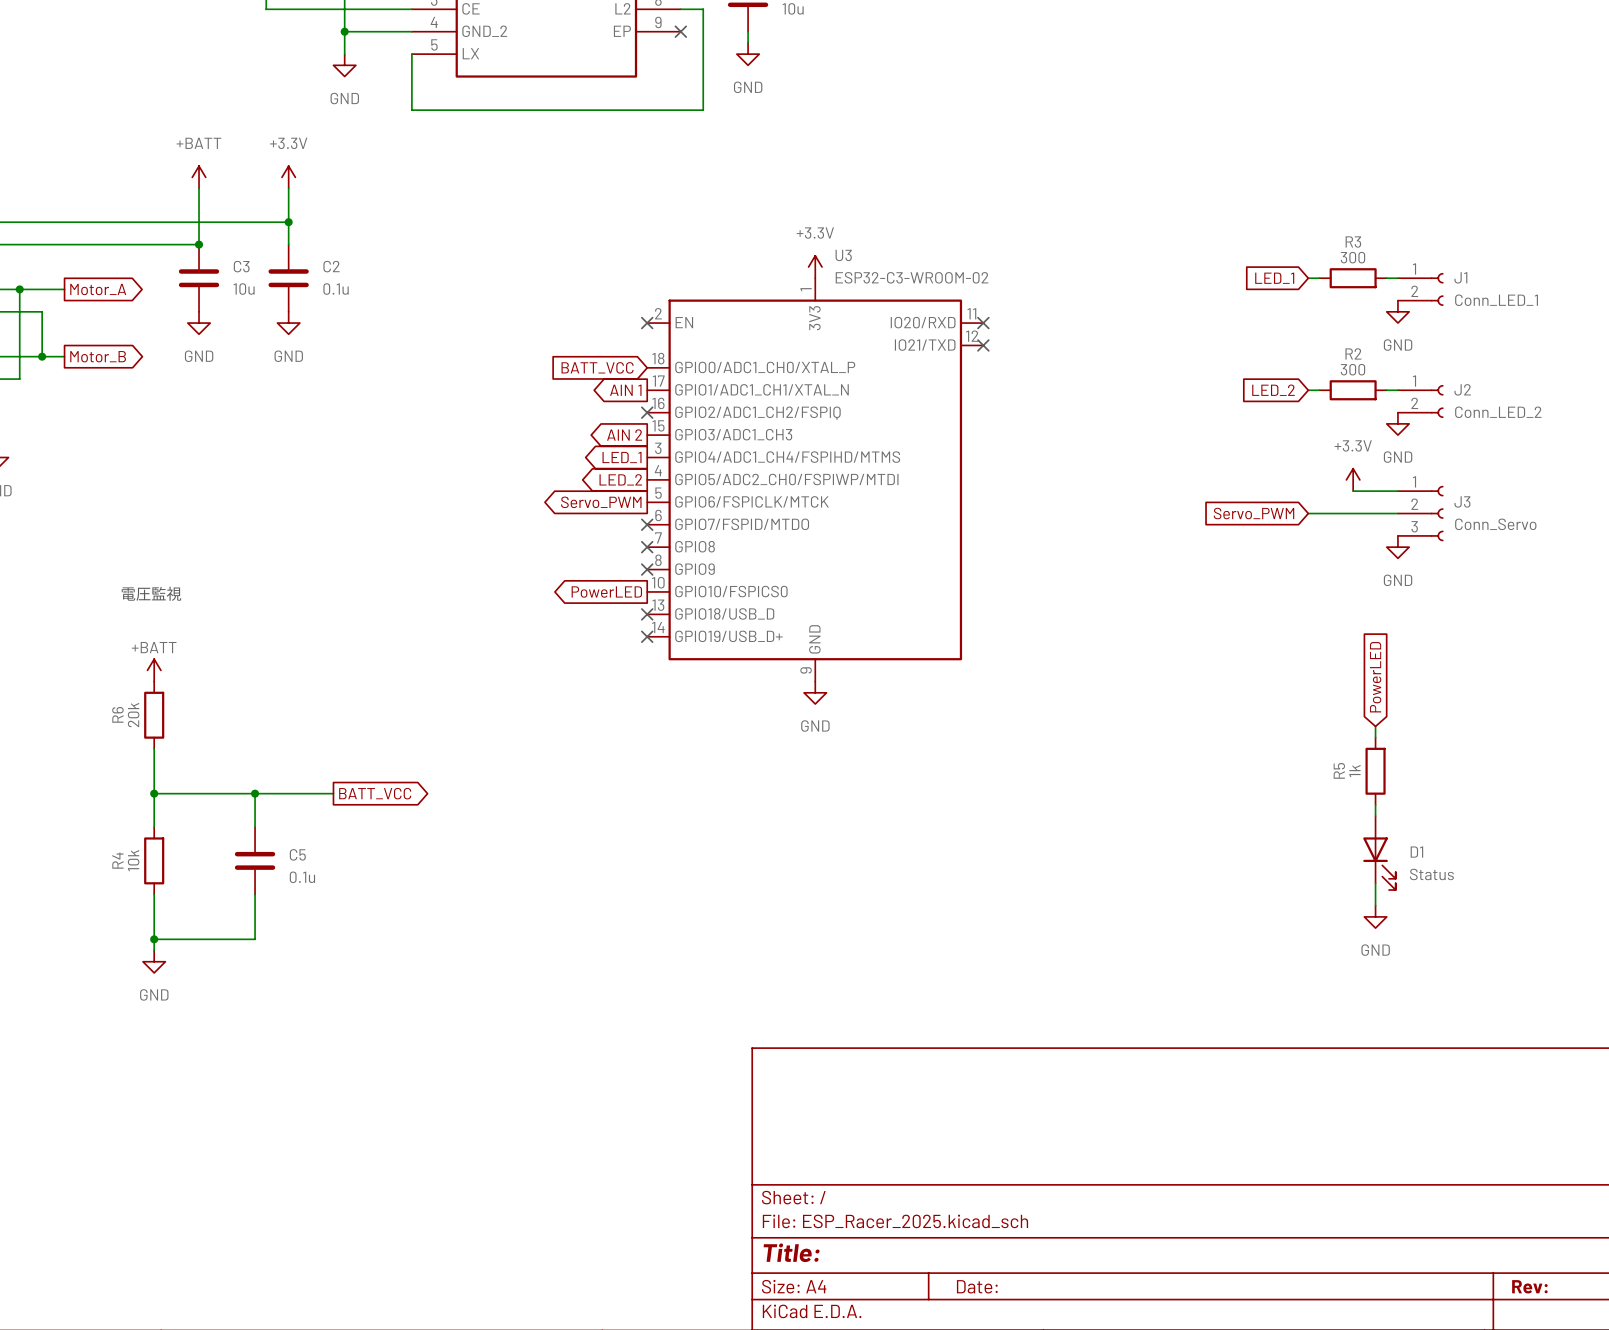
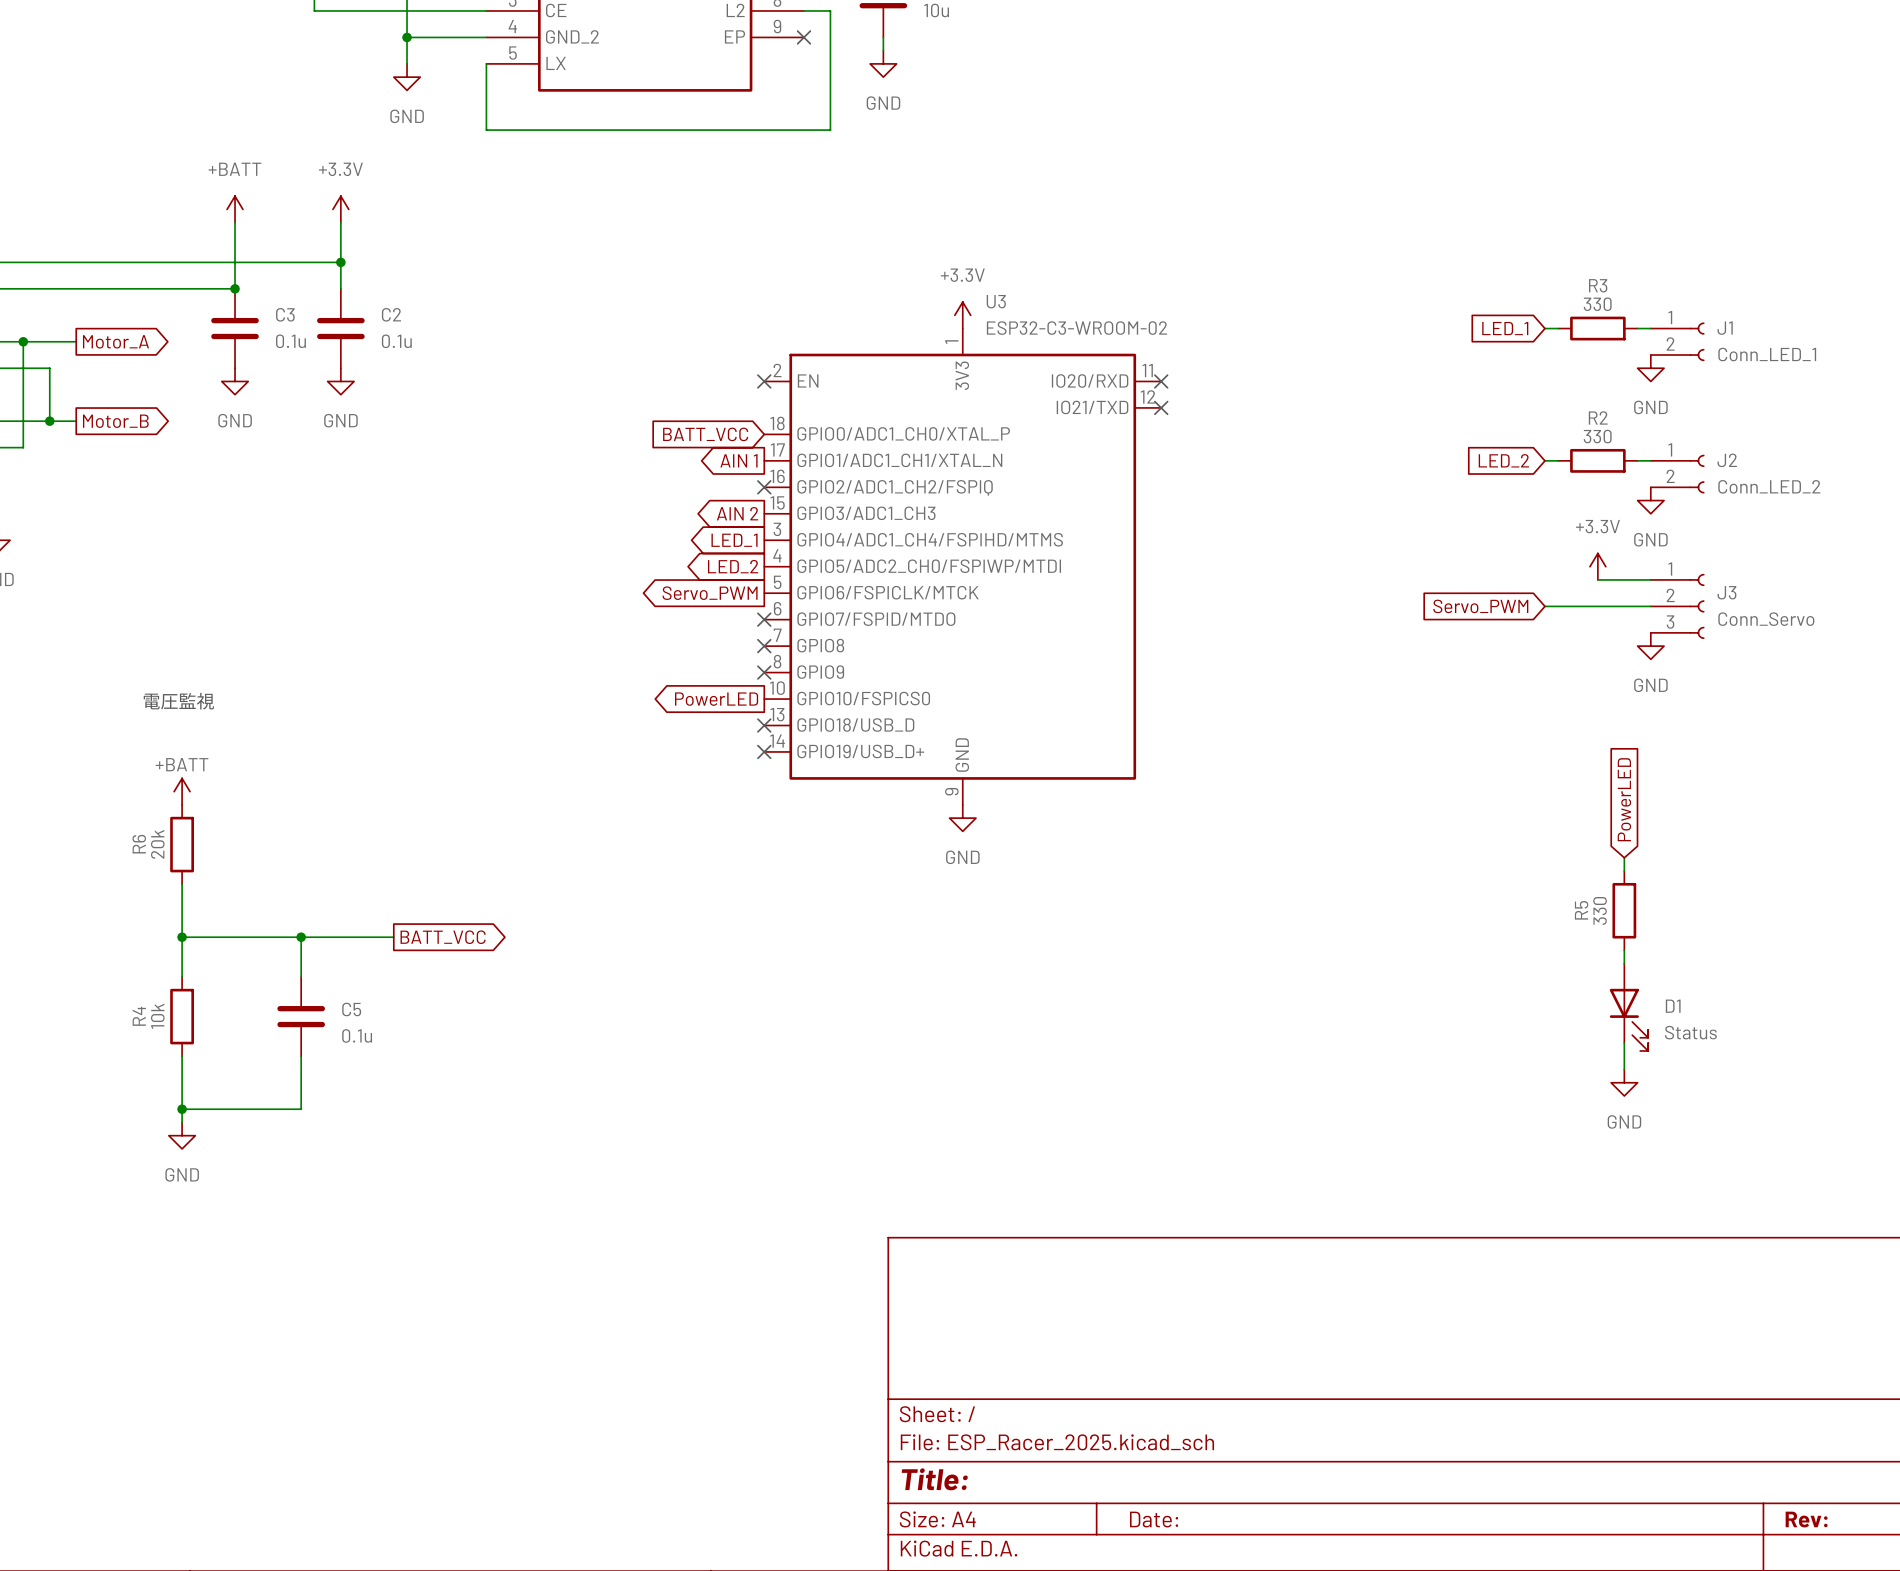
R3 value: 300 (1352, 257) -> 330 (1597, 304)
C3 value: 10u (244, 289) -> 0.1u (290, 341)
R2 value: 300 (1352, 369) -> 330 (1597, 436)
R5 value: 1k (1354, 771) -> 330 (1600, 910)

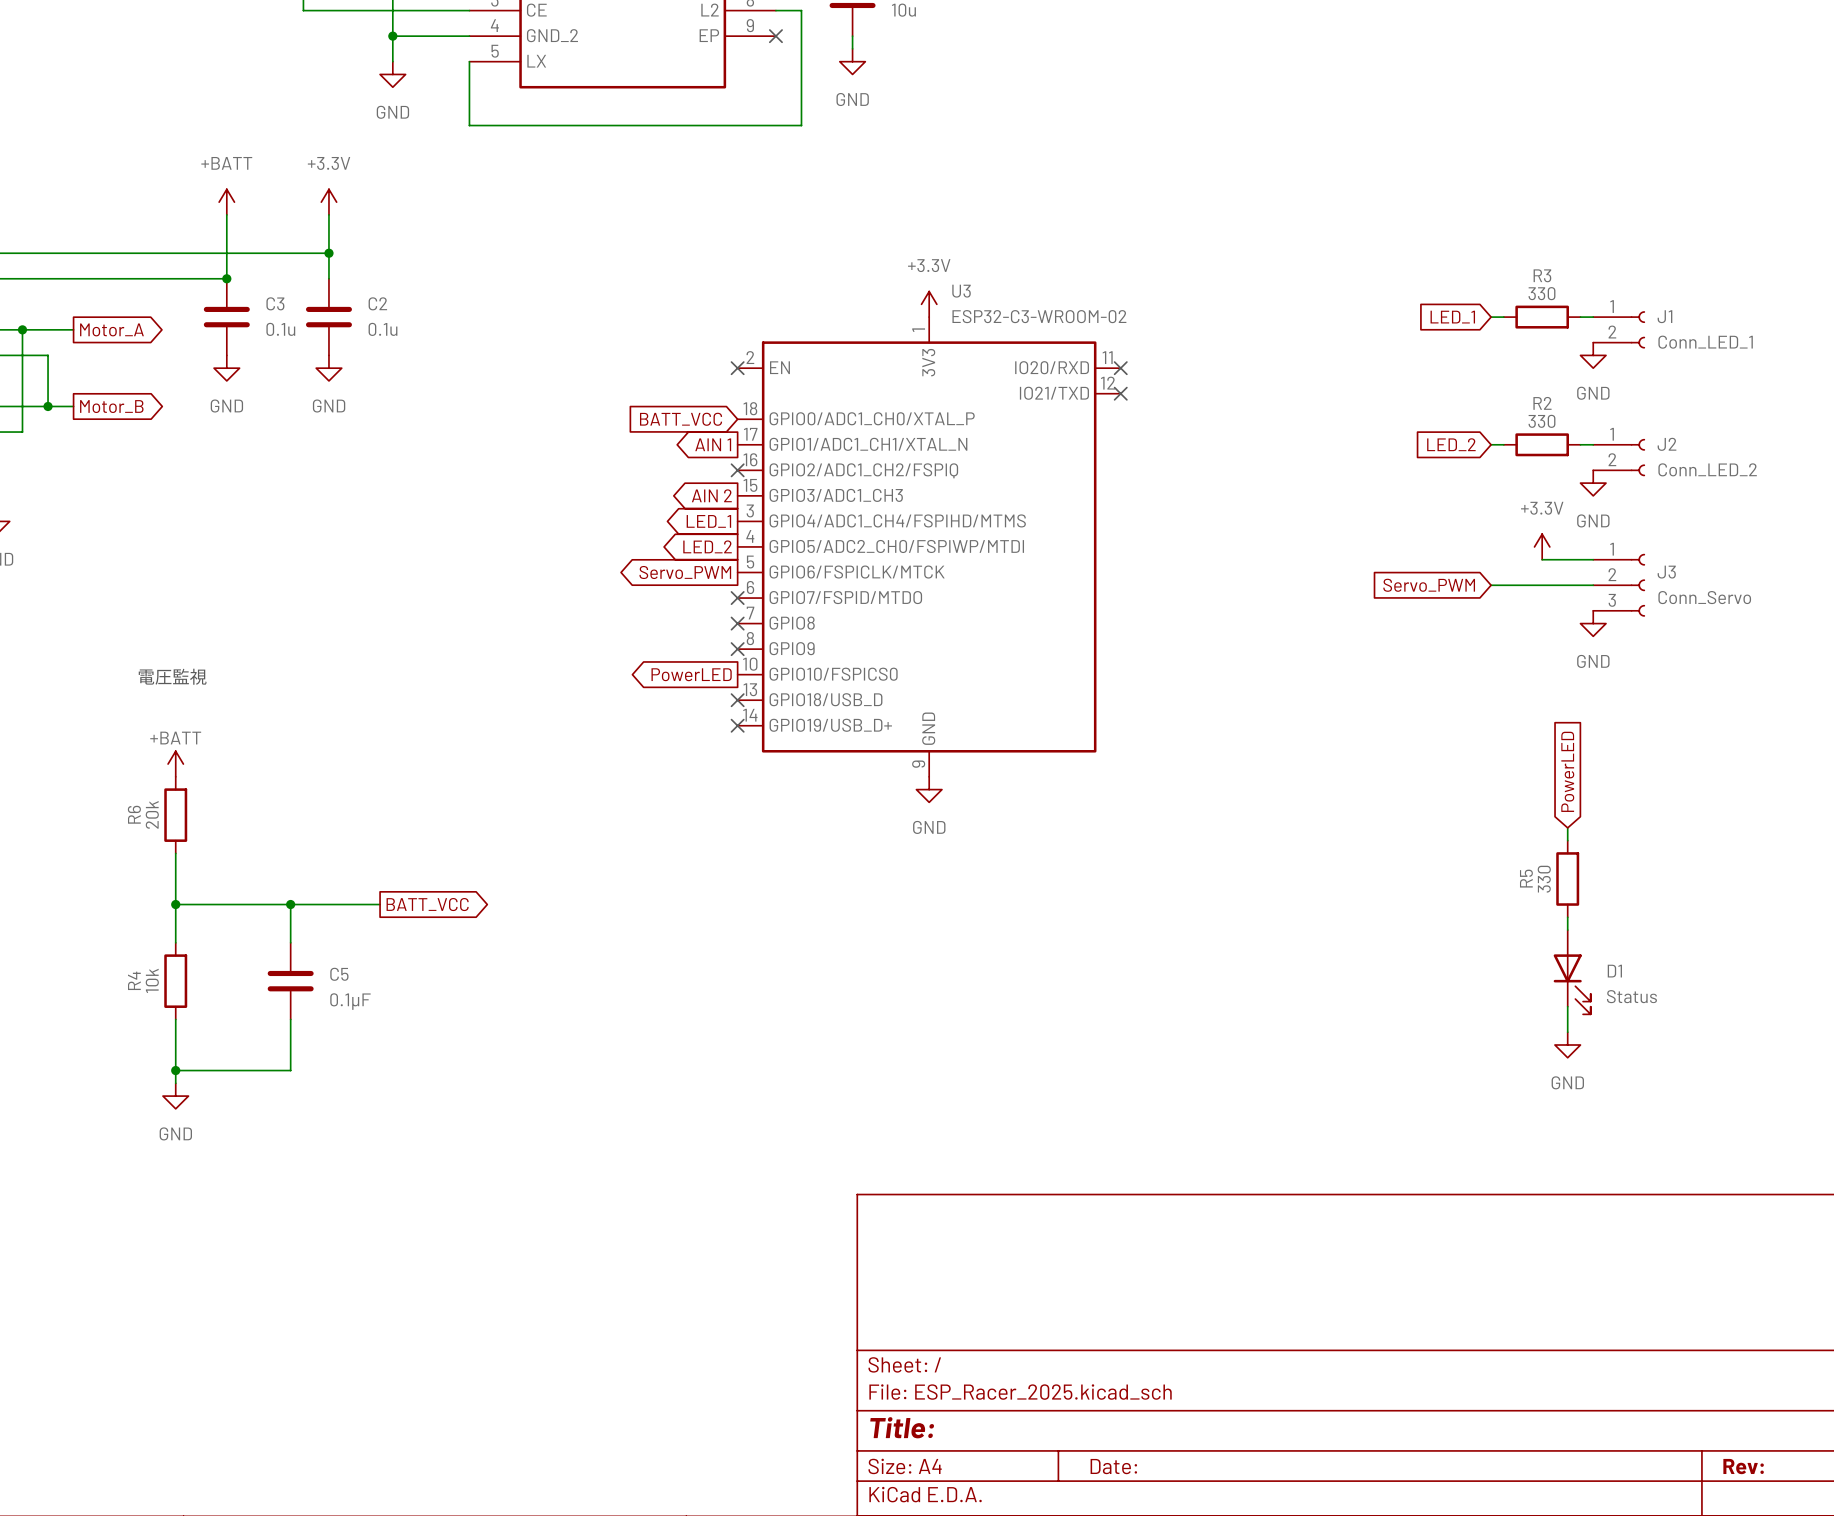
C5 value: 0.1u (357, 1035) -> 0.1μF (350, 1001)

